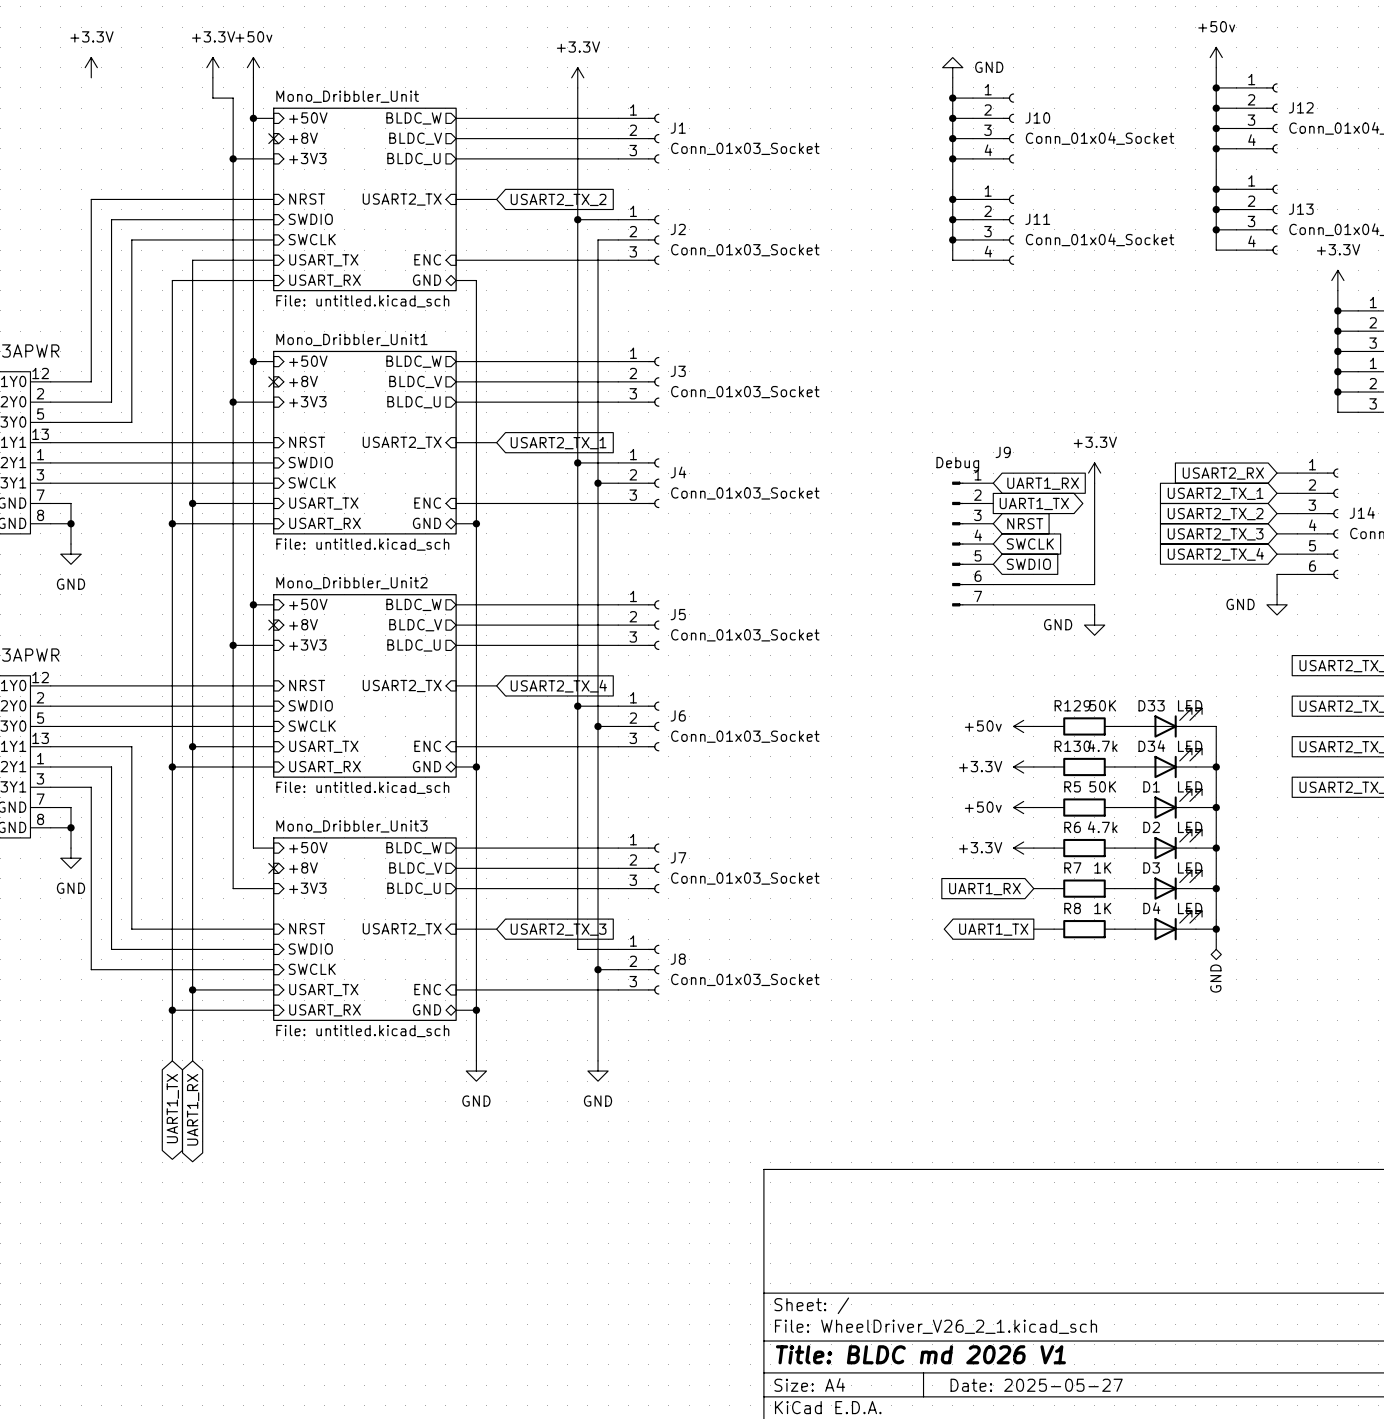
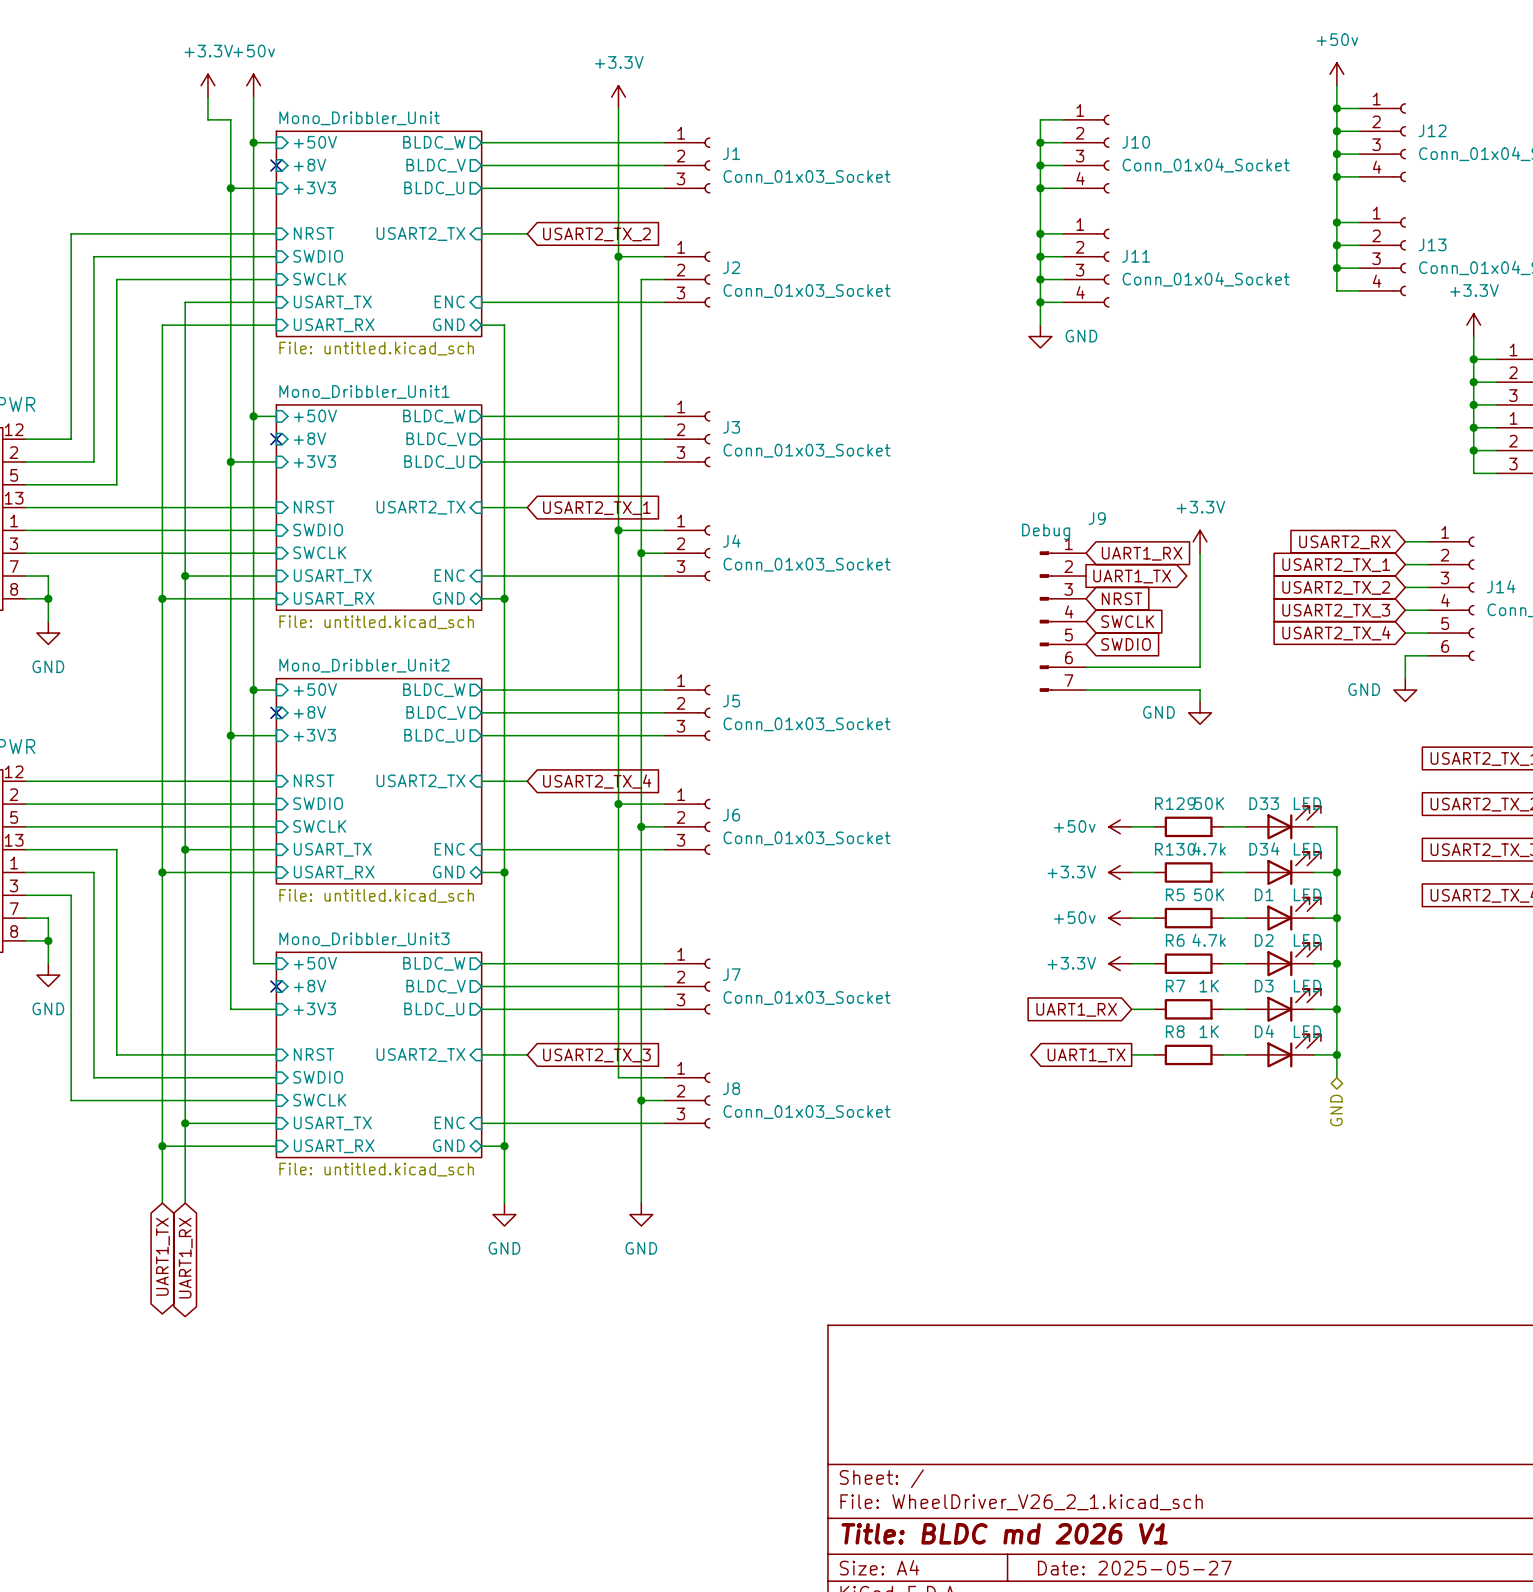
power symbol: +3.3V (91, 67) -> none
power symbol: GND (952, 67) -> none
wire: (952, 77) (952, 98) -> (1040, 302) (1040, 325)
junction: (952, 98) -> none
junction: none -> (1040, 302)
power symbol: none -> GND (1040, 336)

